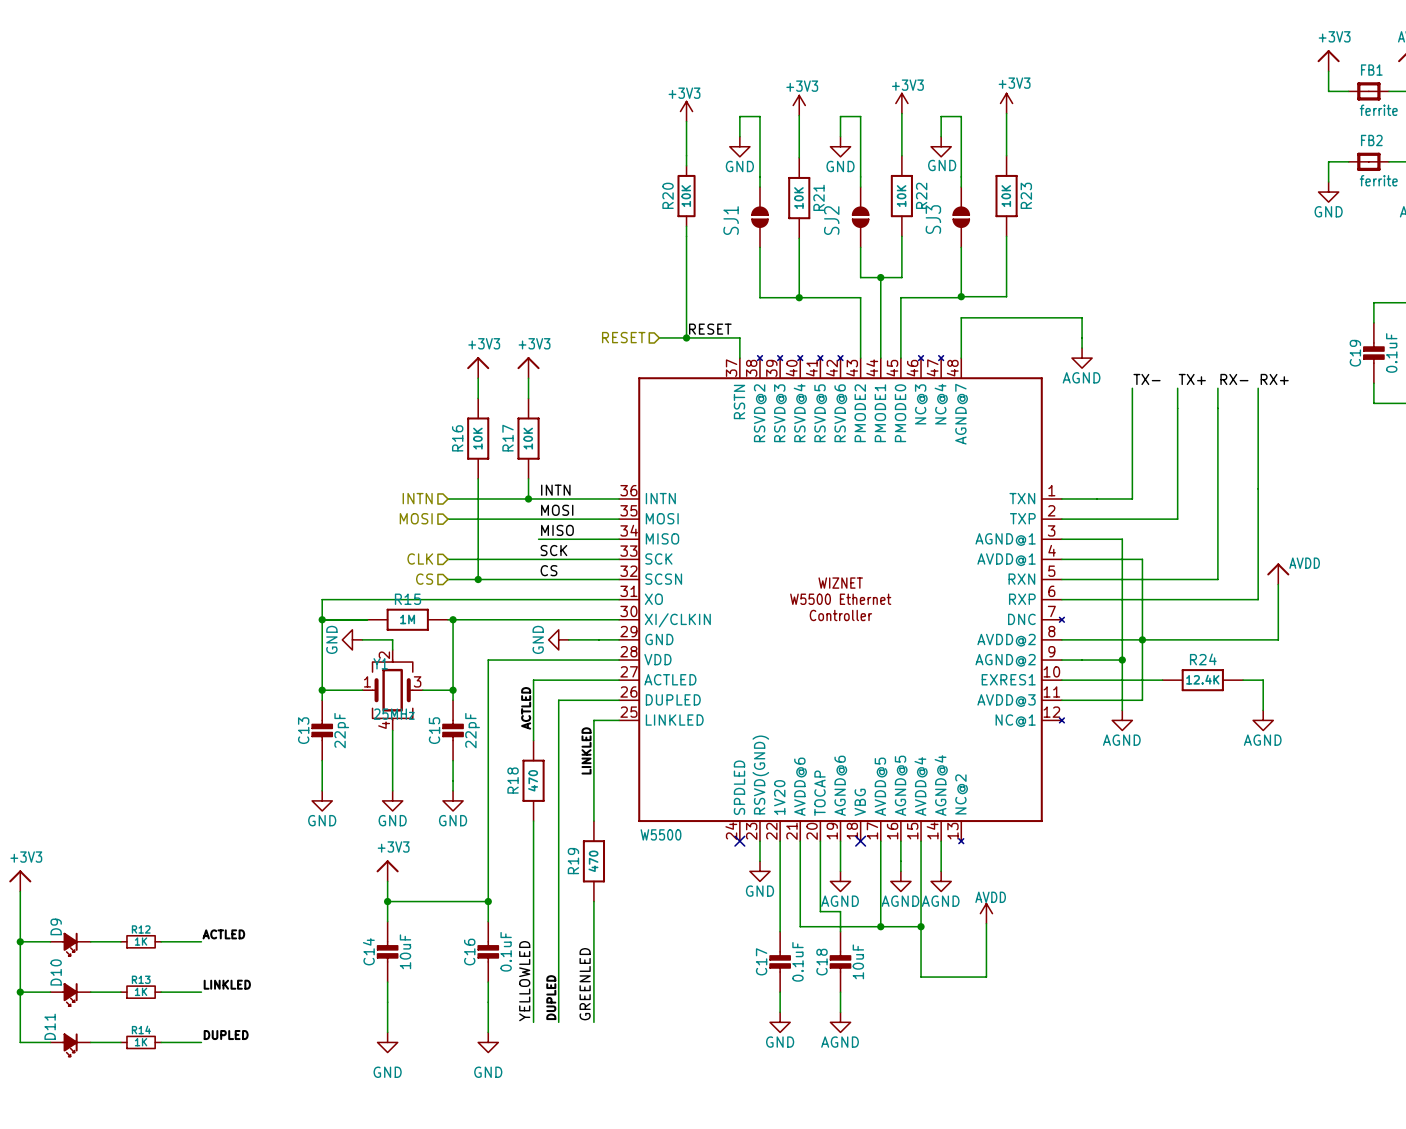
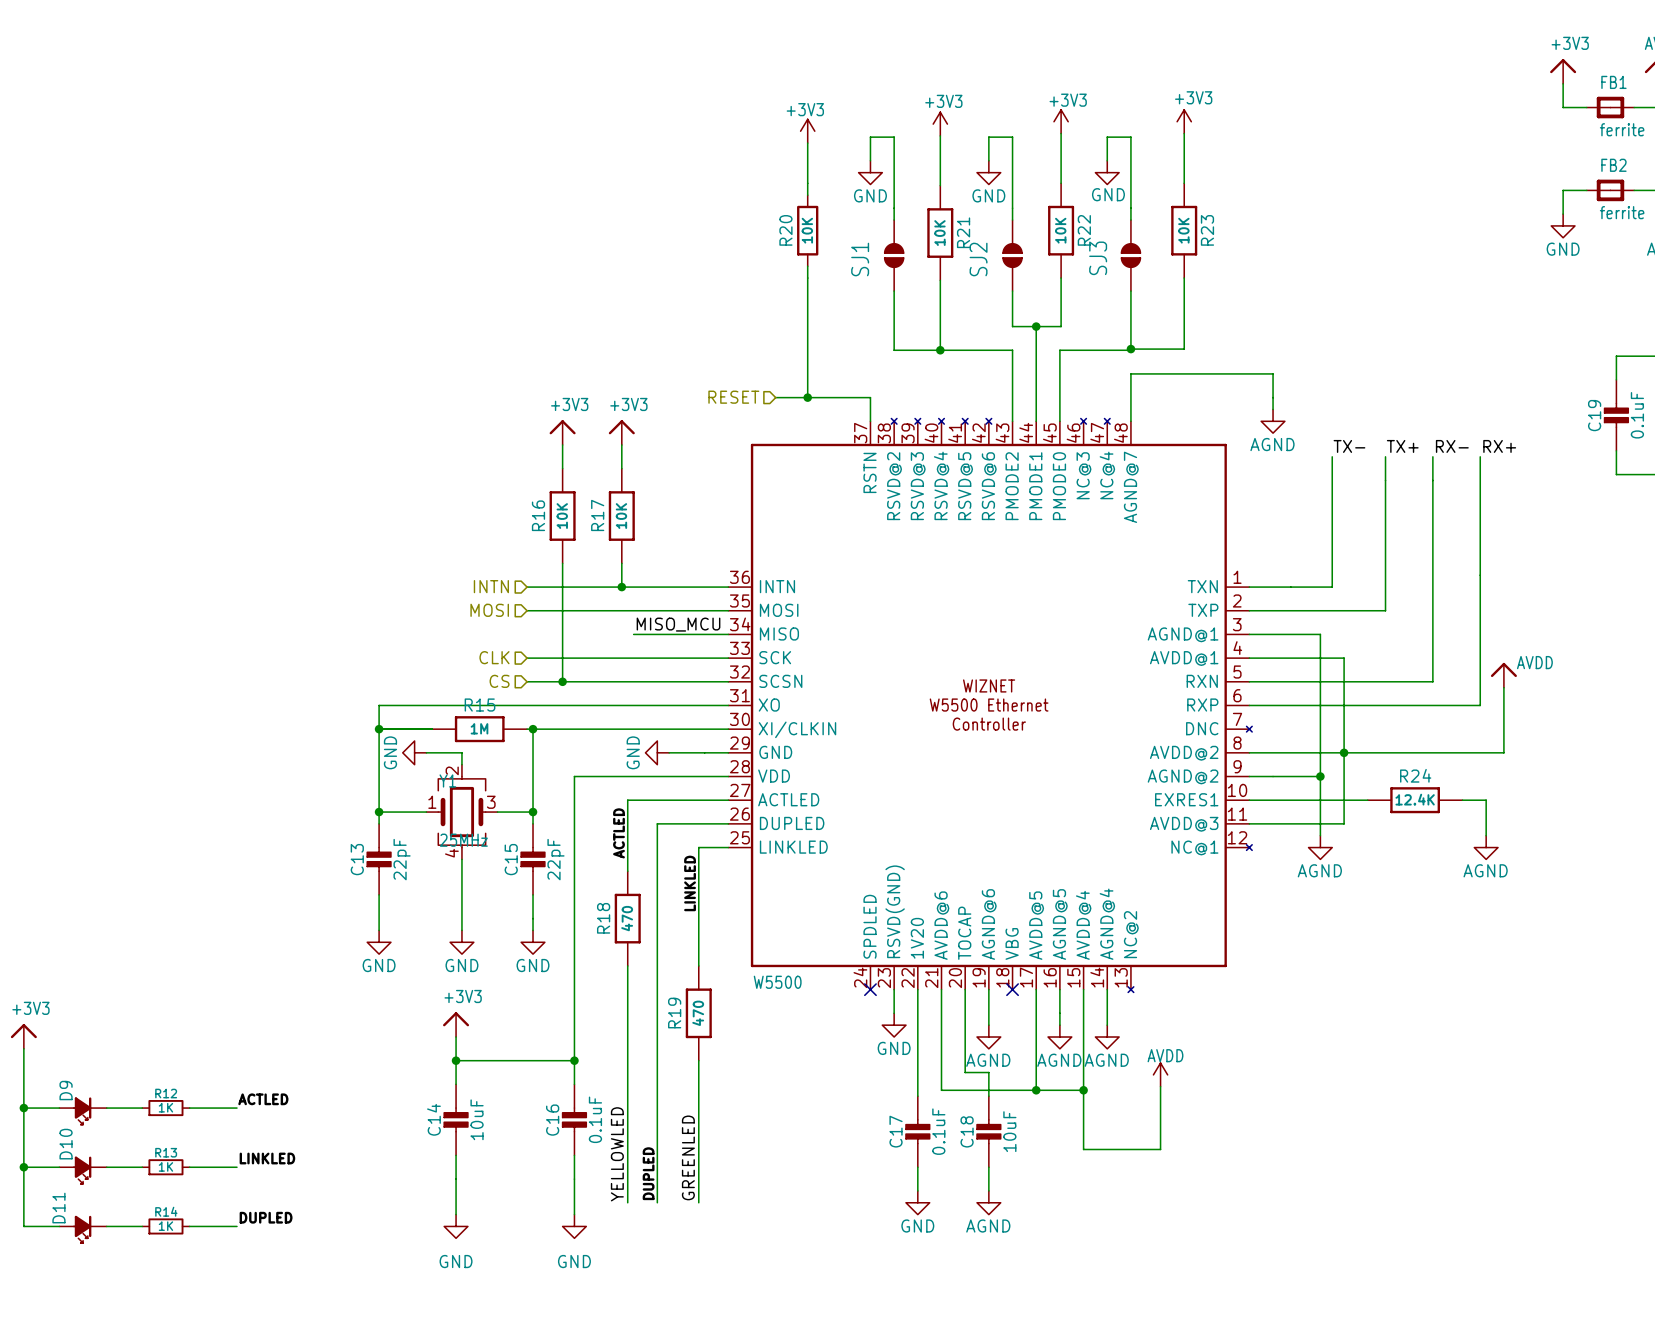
label: RESET (710, 329) -> none
label: INTN (555, 490) -> none
label: MOSI (557, 510) -> none
label: MISO (557, 530) -> MISO_MCU (678, 624)
label: SCK (553, 550) -> none
label: CS (549, 570) -> none

